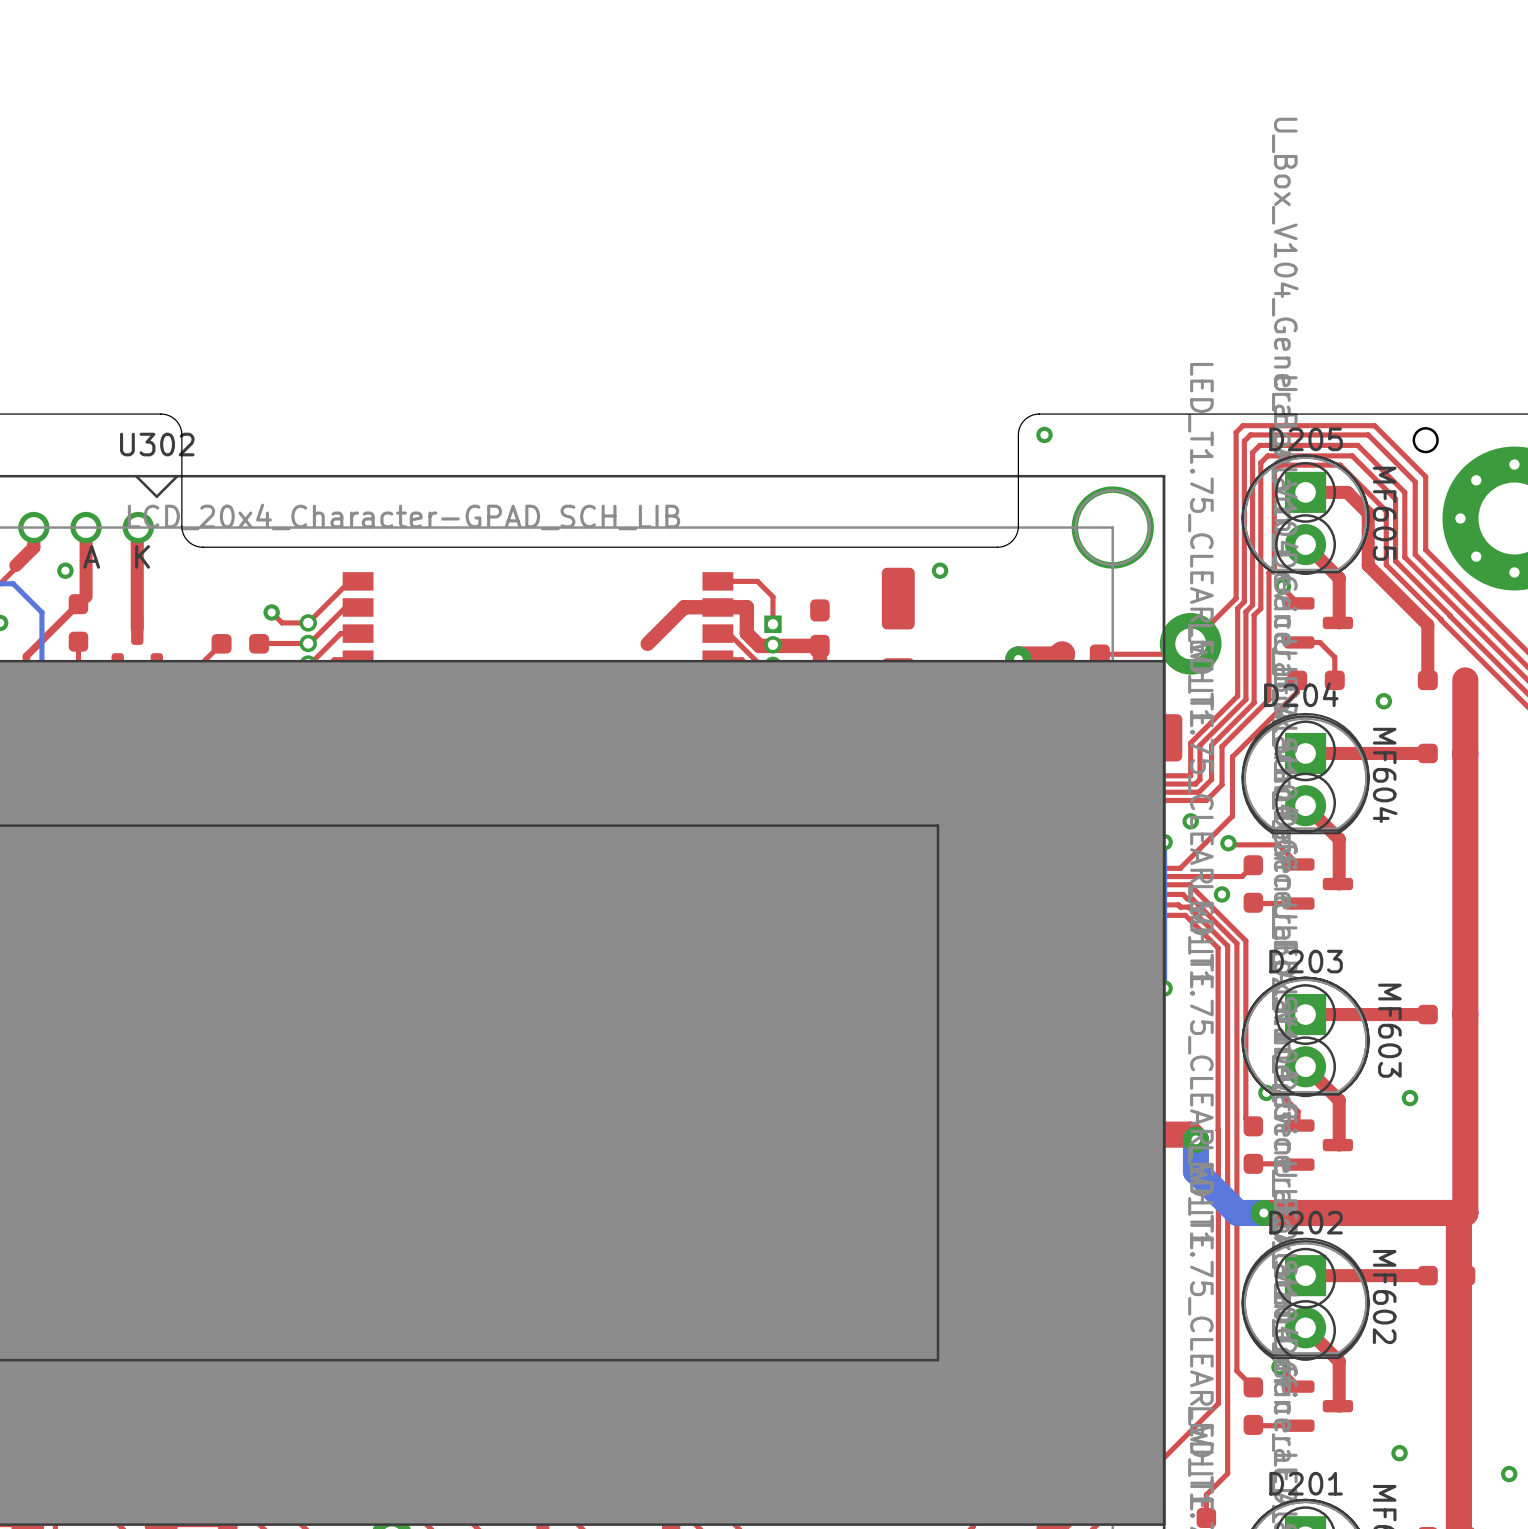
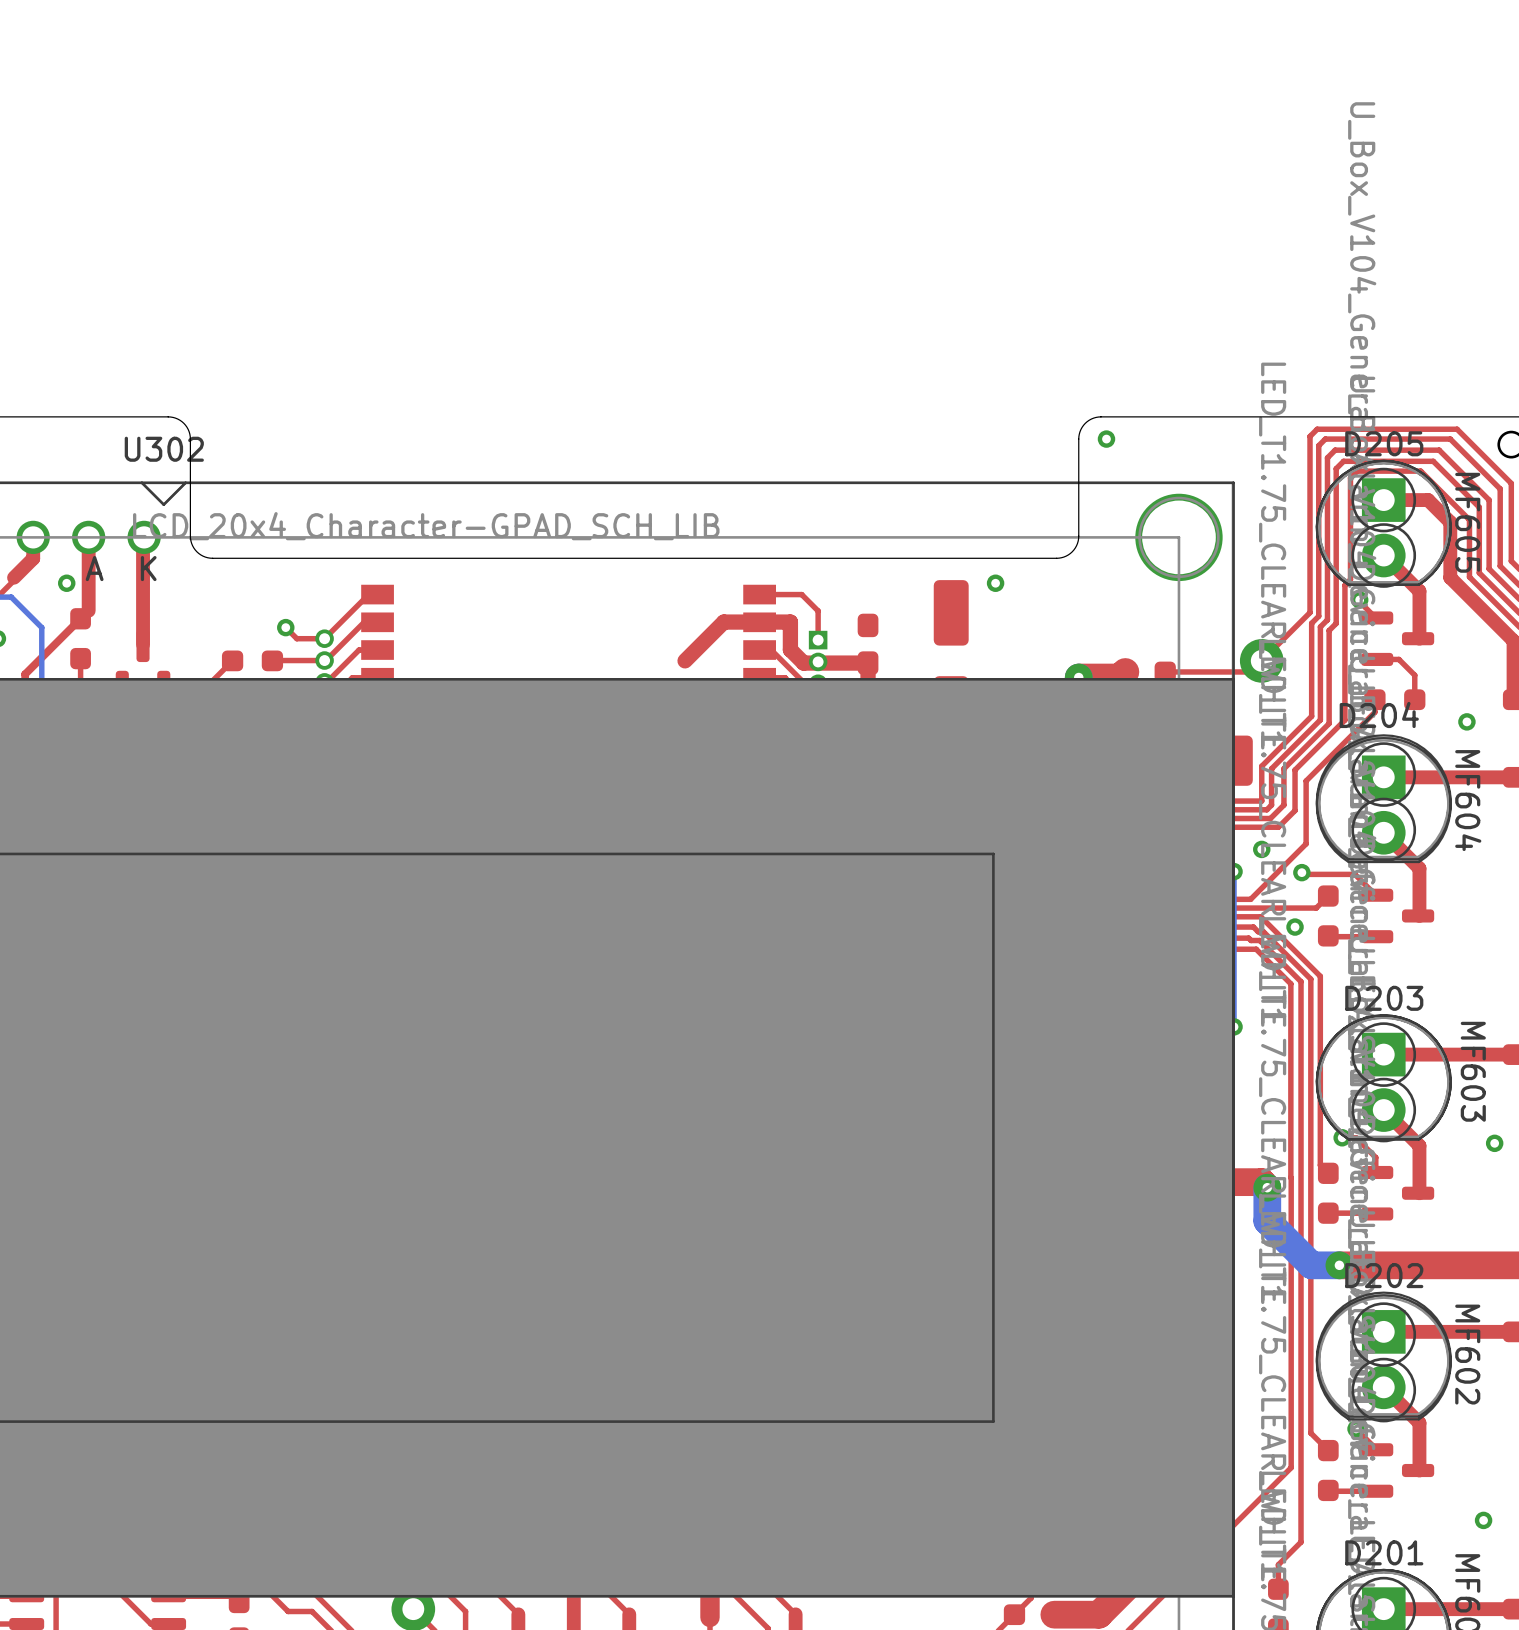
part footprint: [1159, 612, 1222, 675] -> [1239, 639, 1284, 683]

